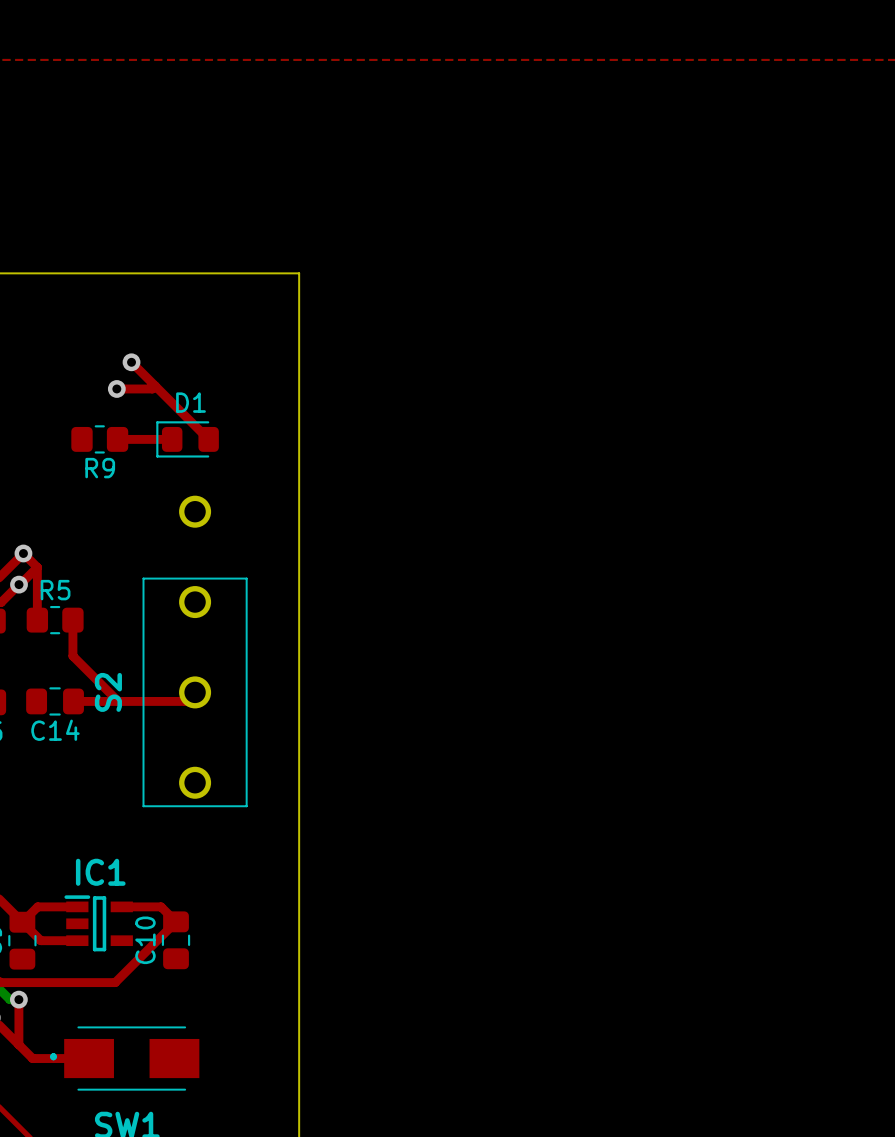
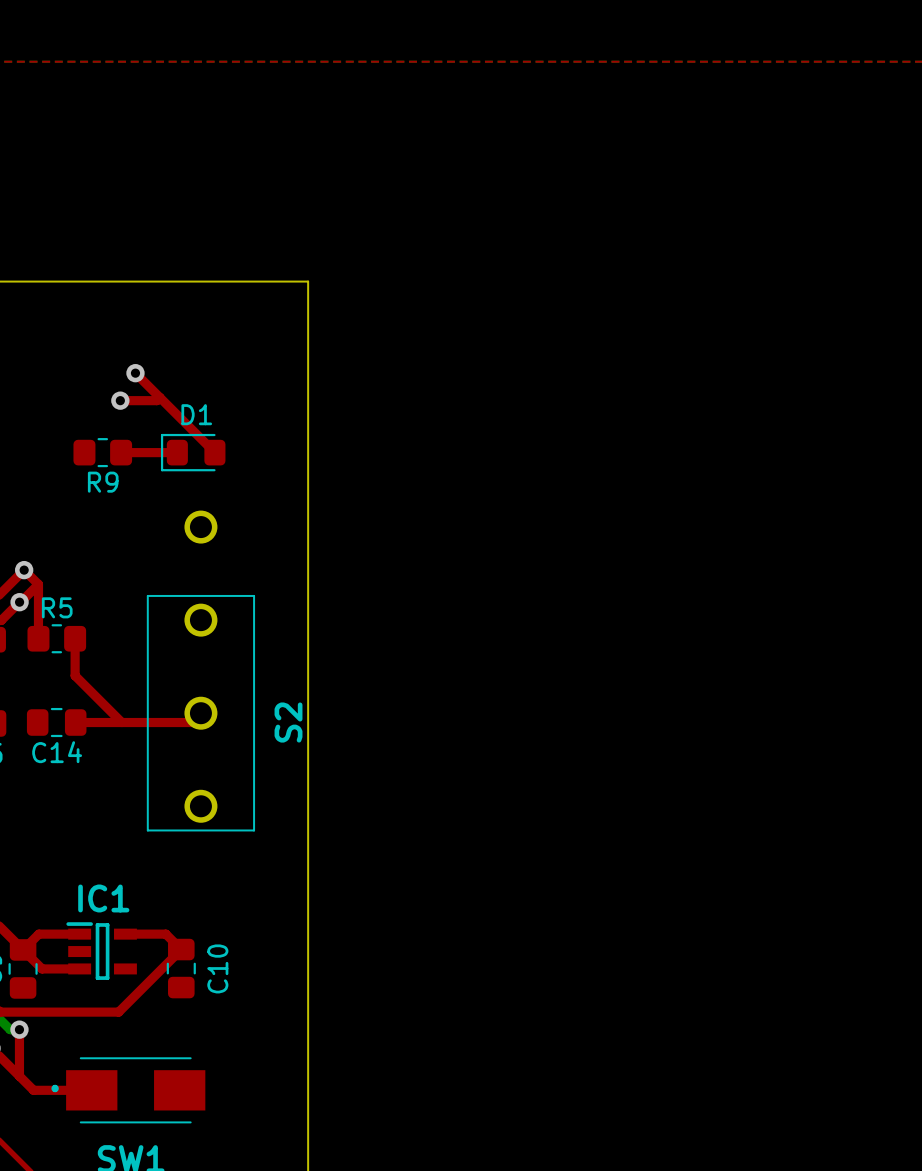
S2 name position: S2 (108, 692) -> S2 (288, 722)
C10 name position: C10 (145, 940) -> C10 (217, 968)

